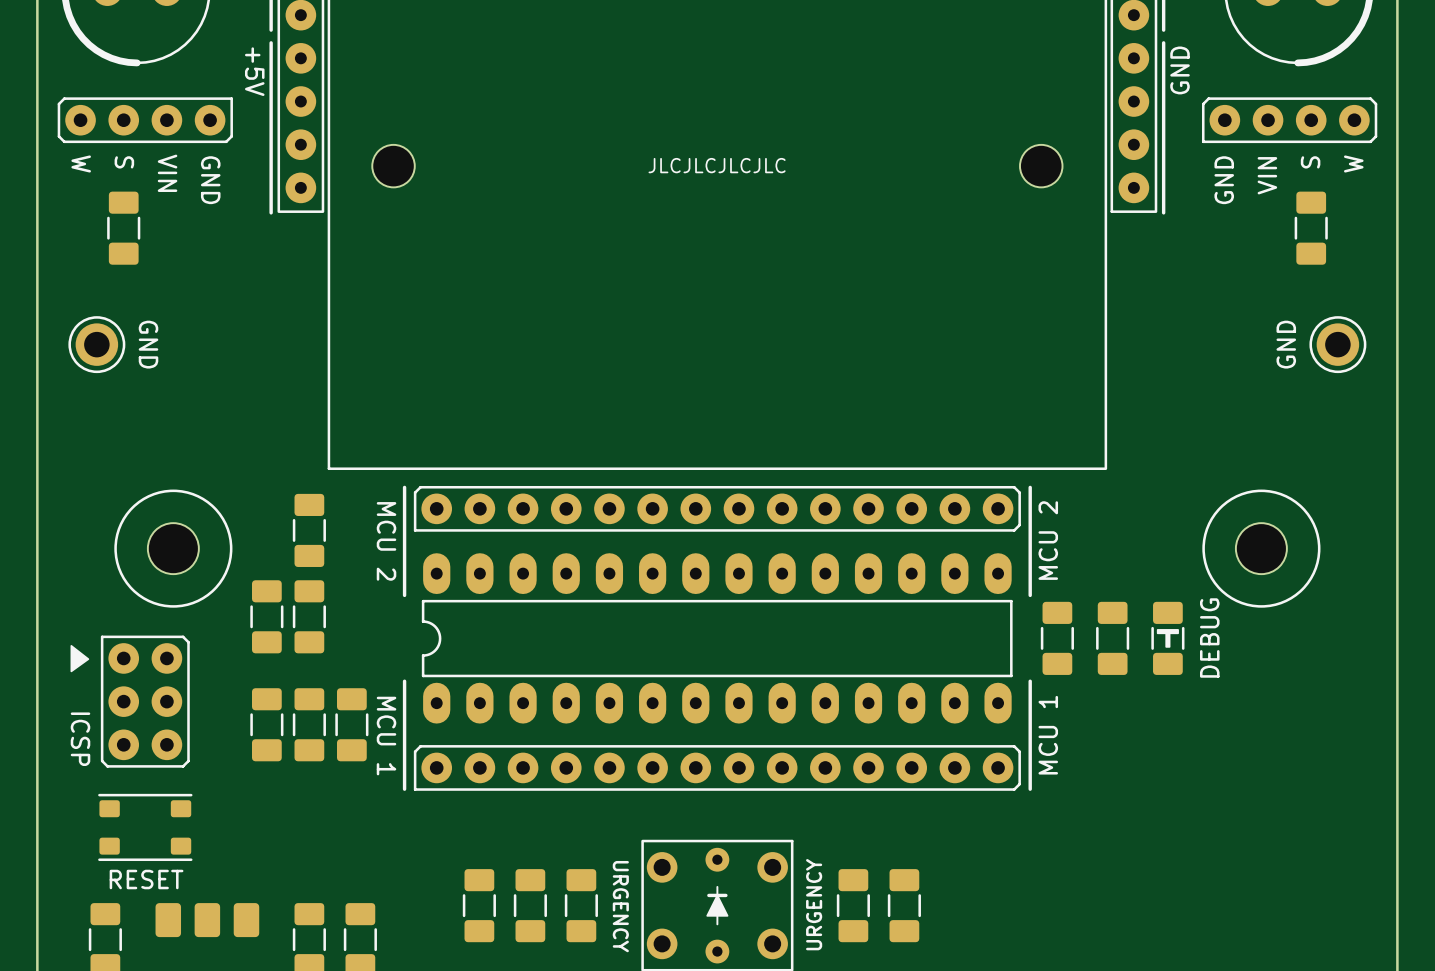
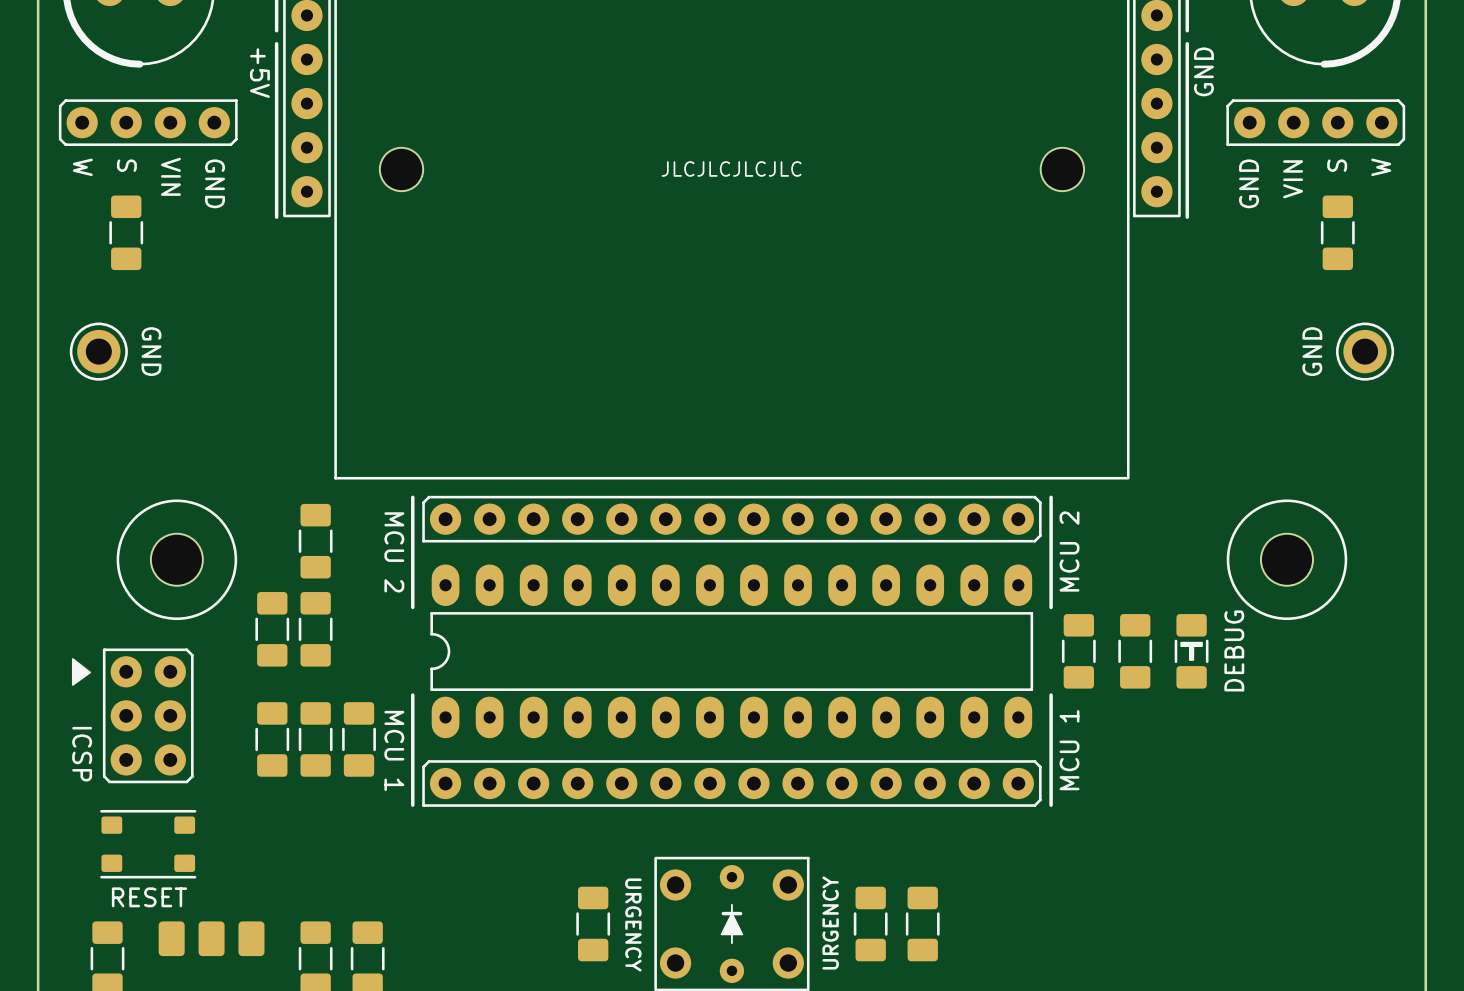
part: (479, 905) -> none
part: (530, 905) -> none

